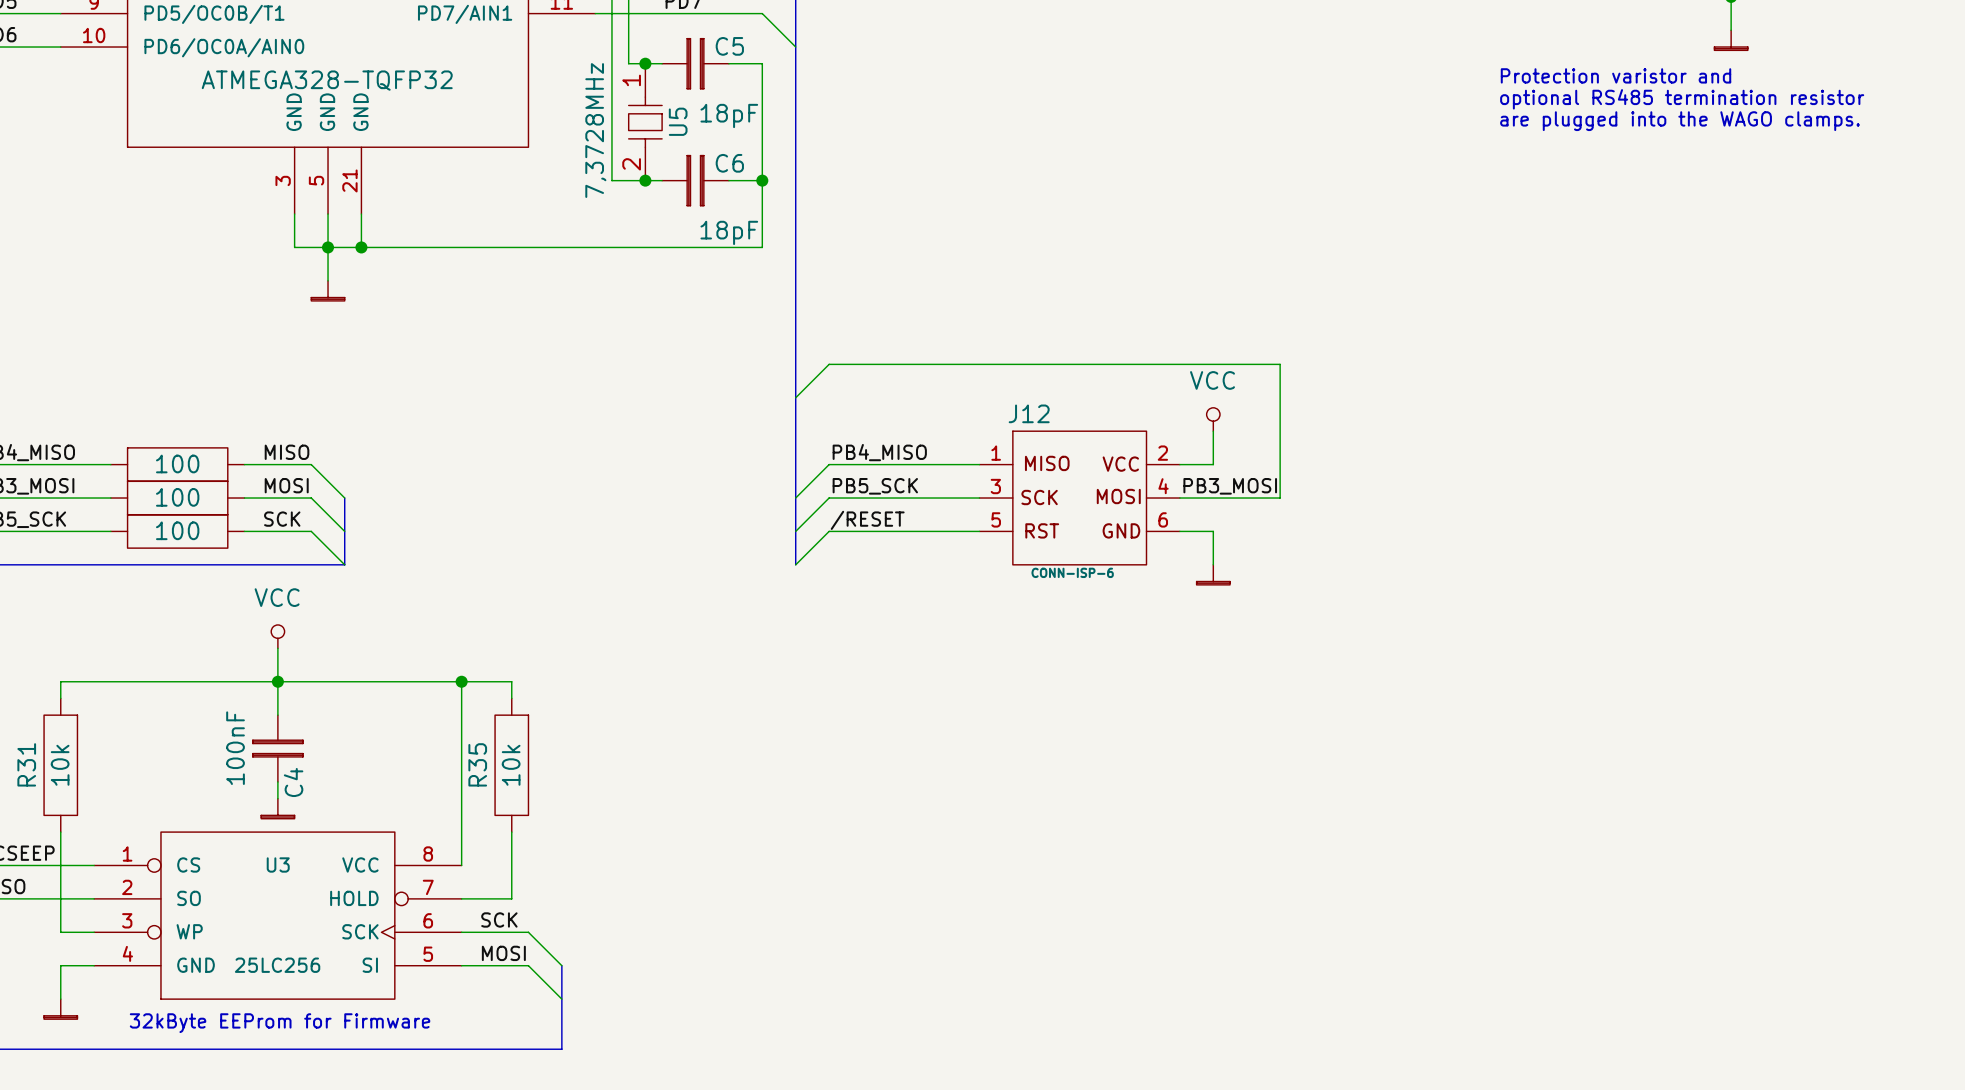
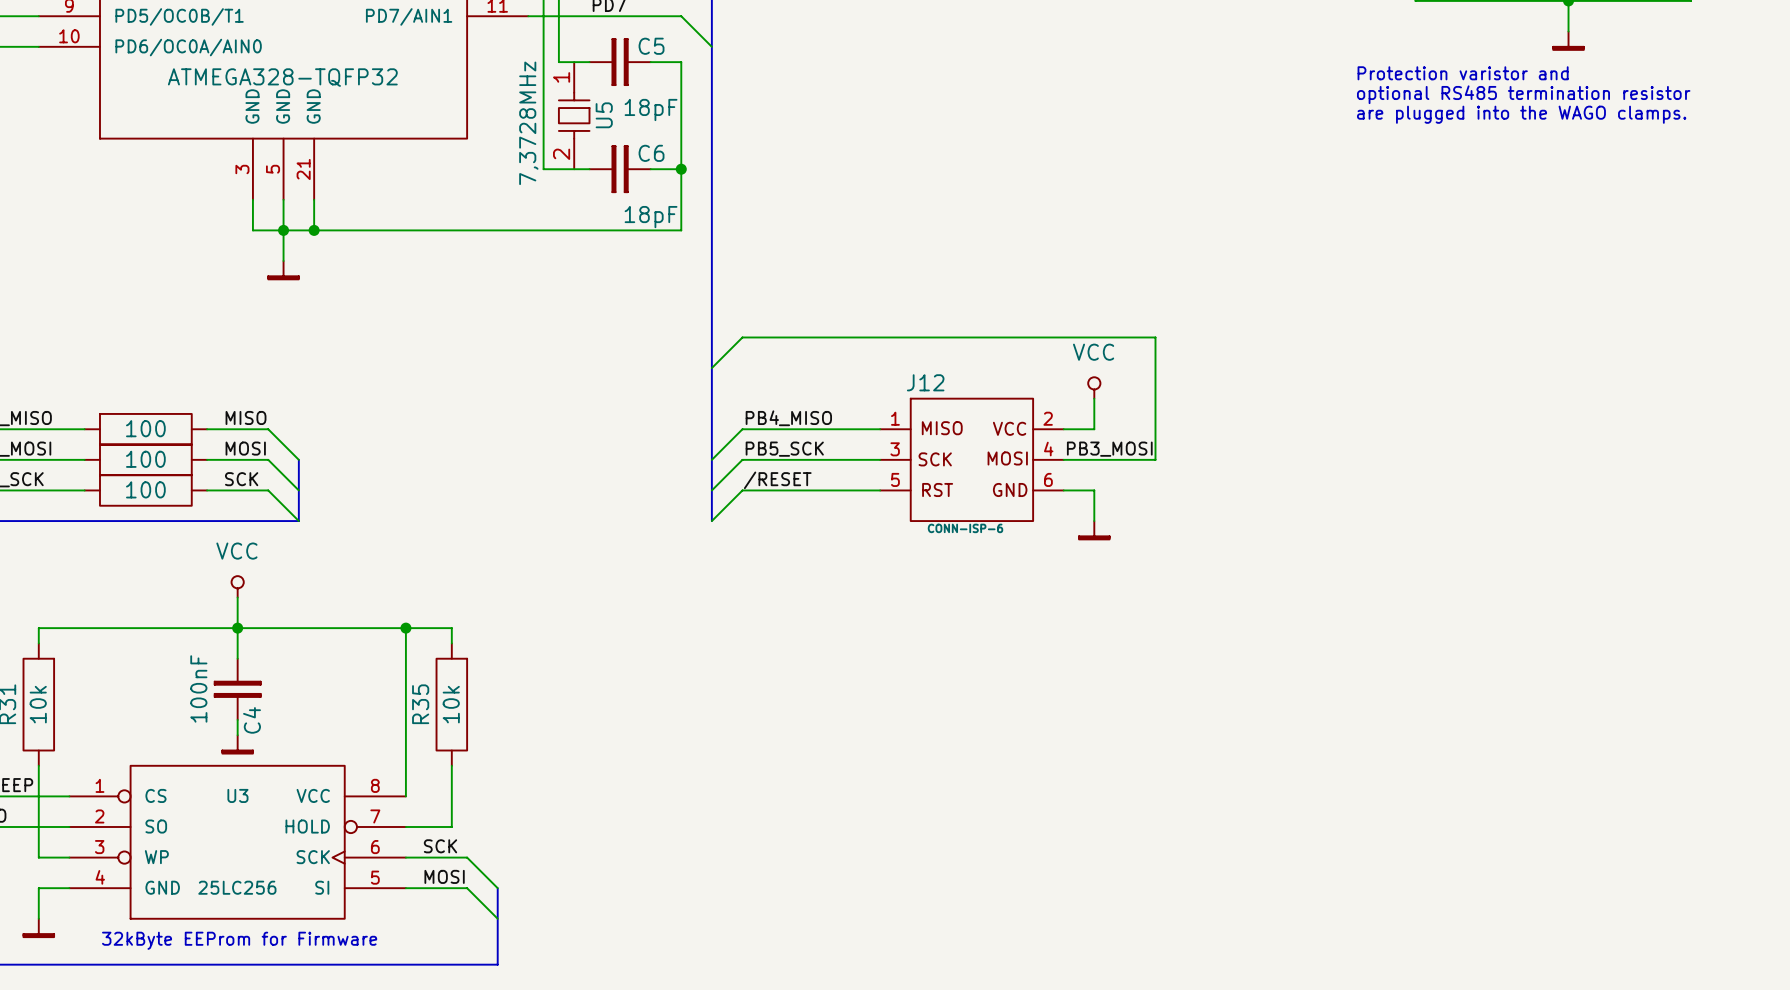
junction: (645, 63) -> none
junction: (645, 180) -> none

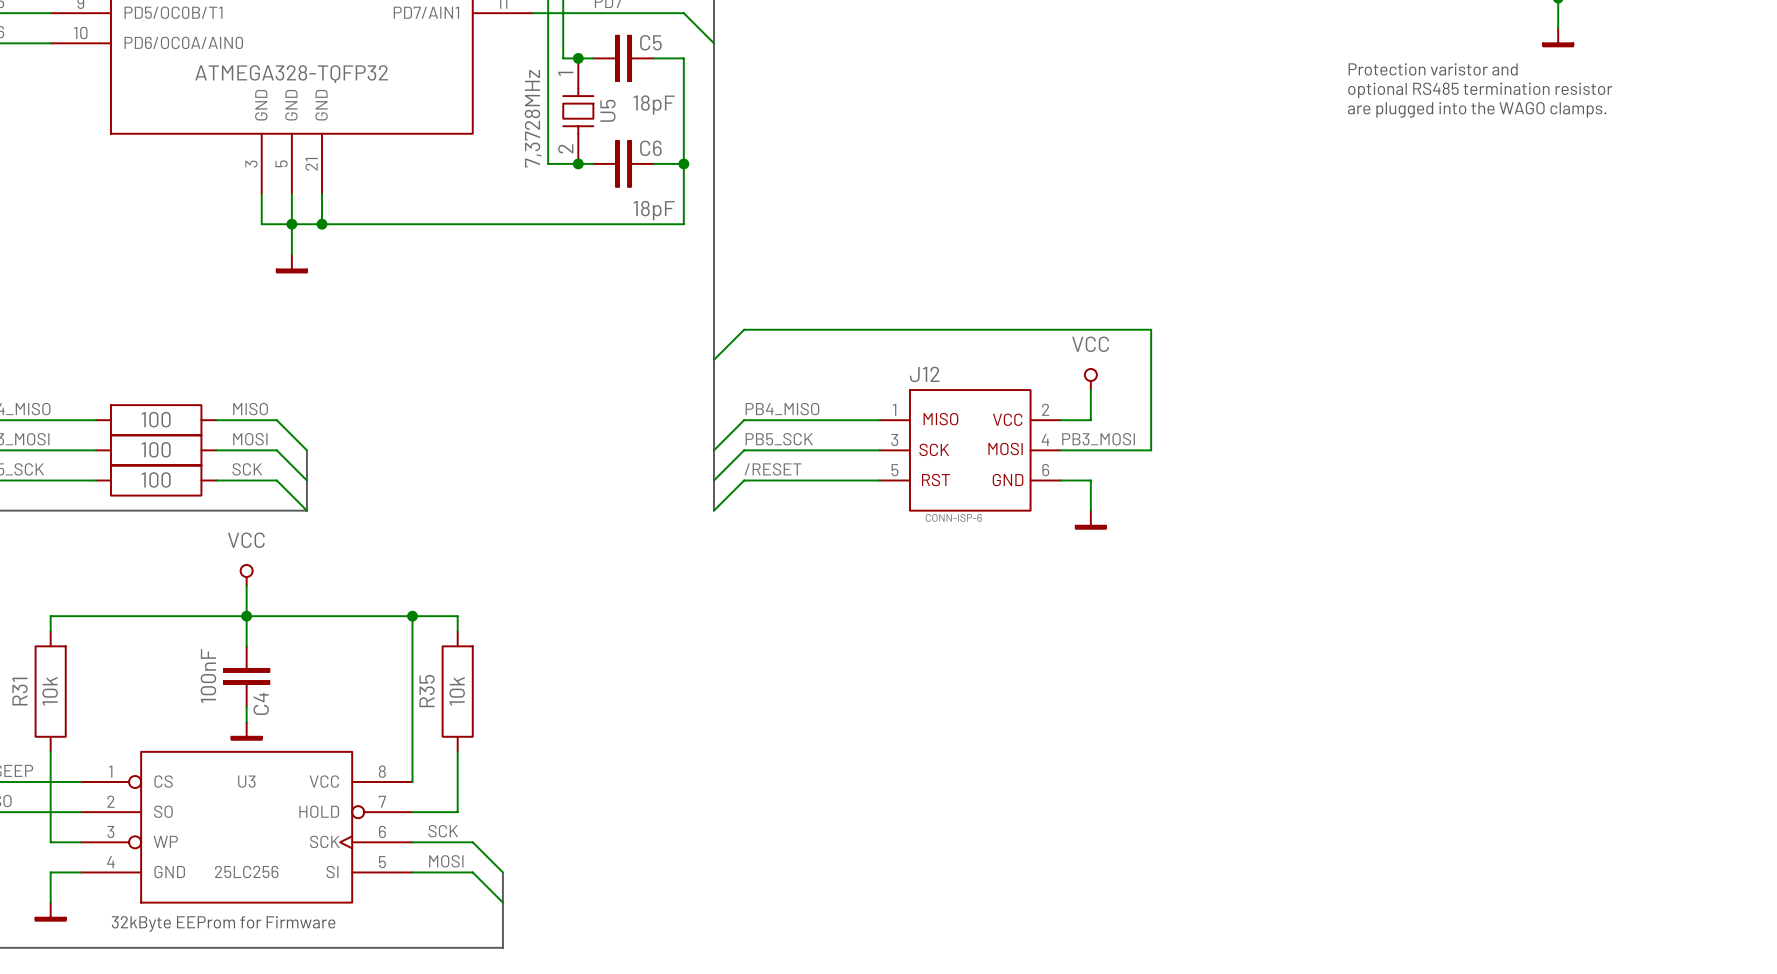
junction: none -> (578, 58)
junction: none -> (578, 163)

